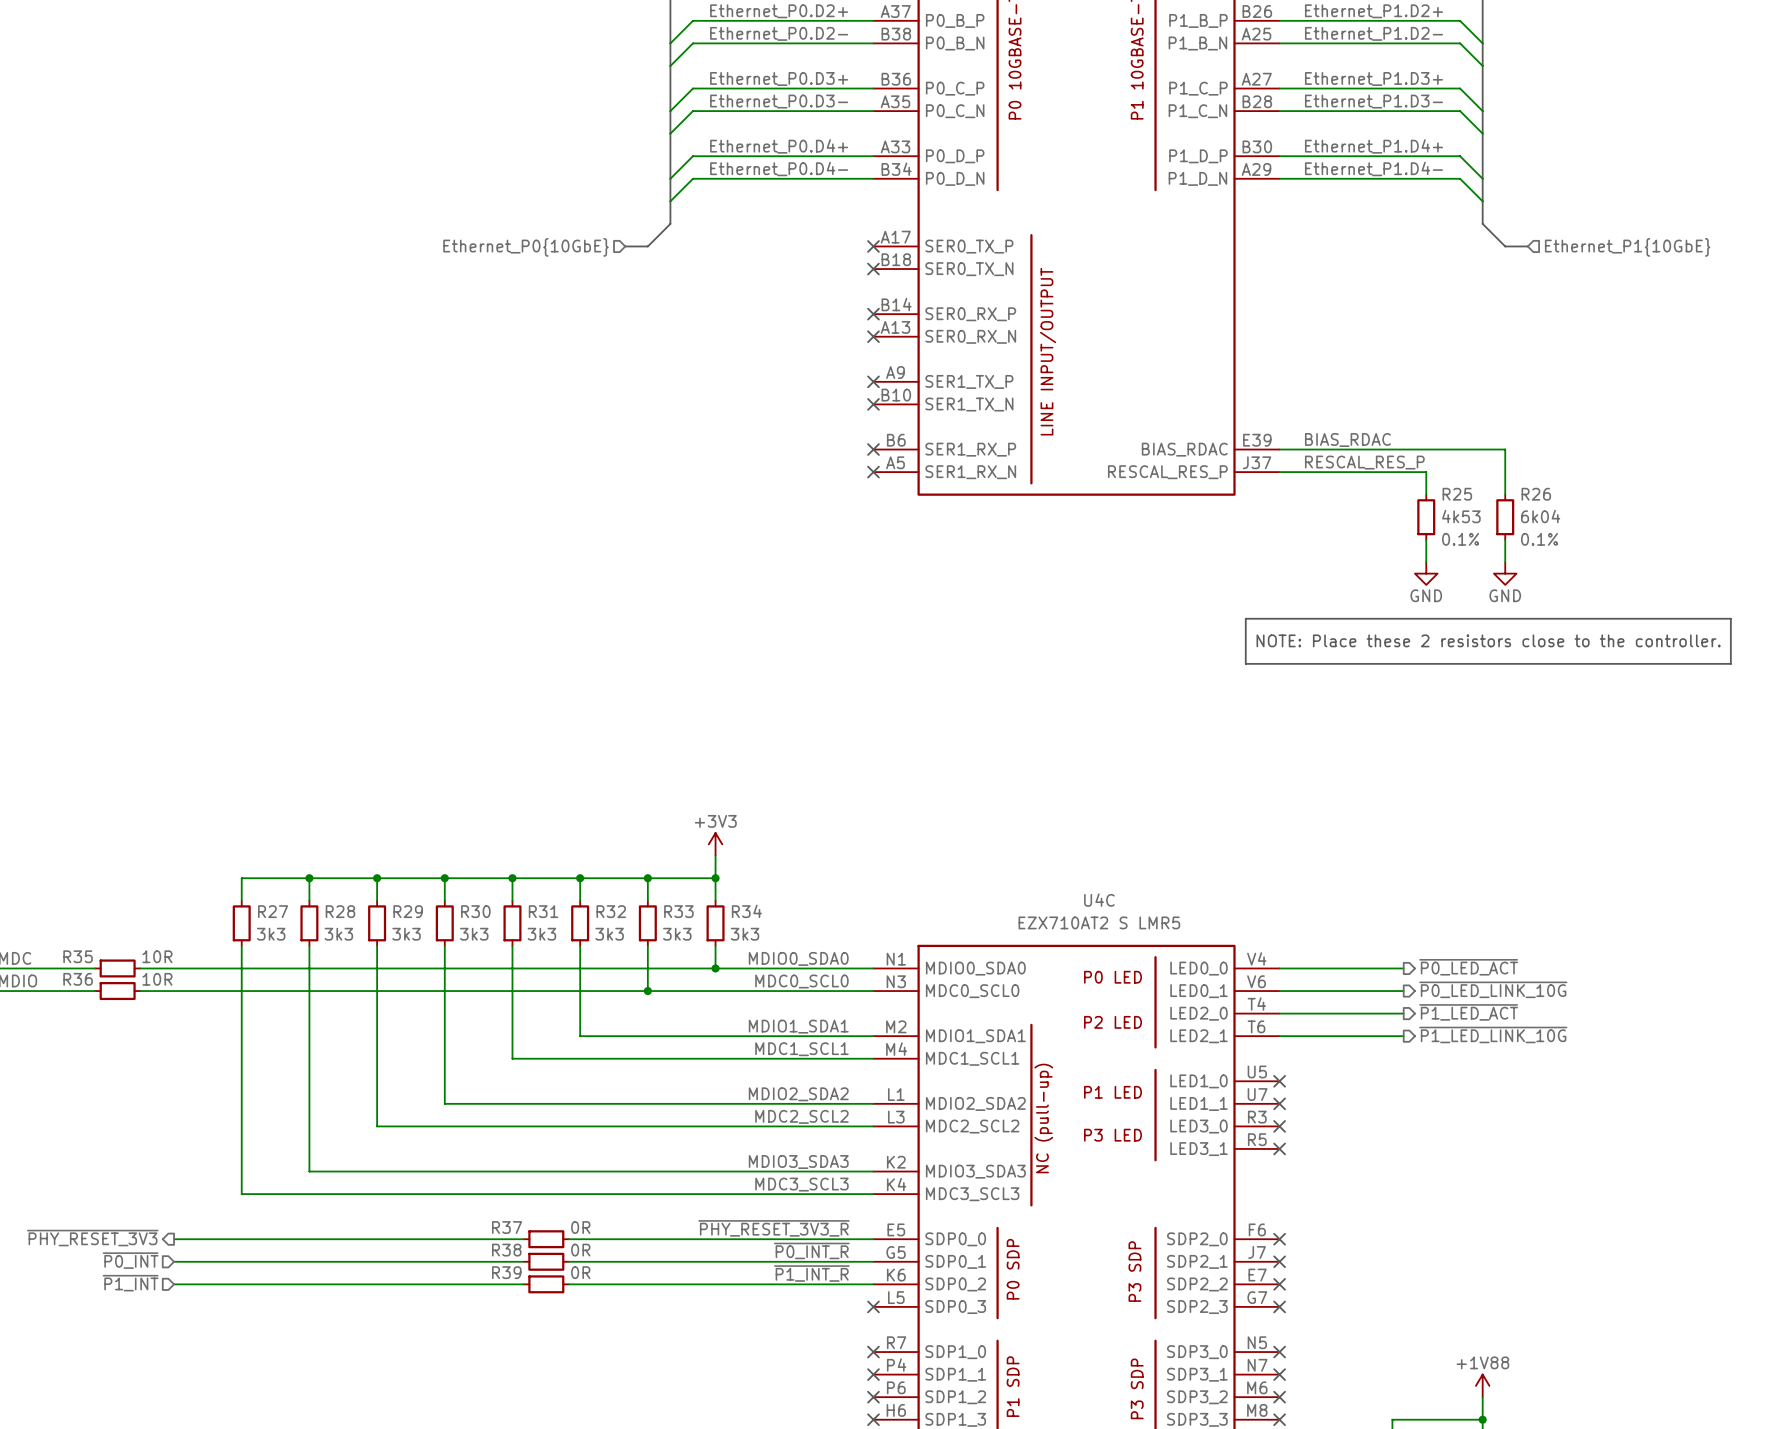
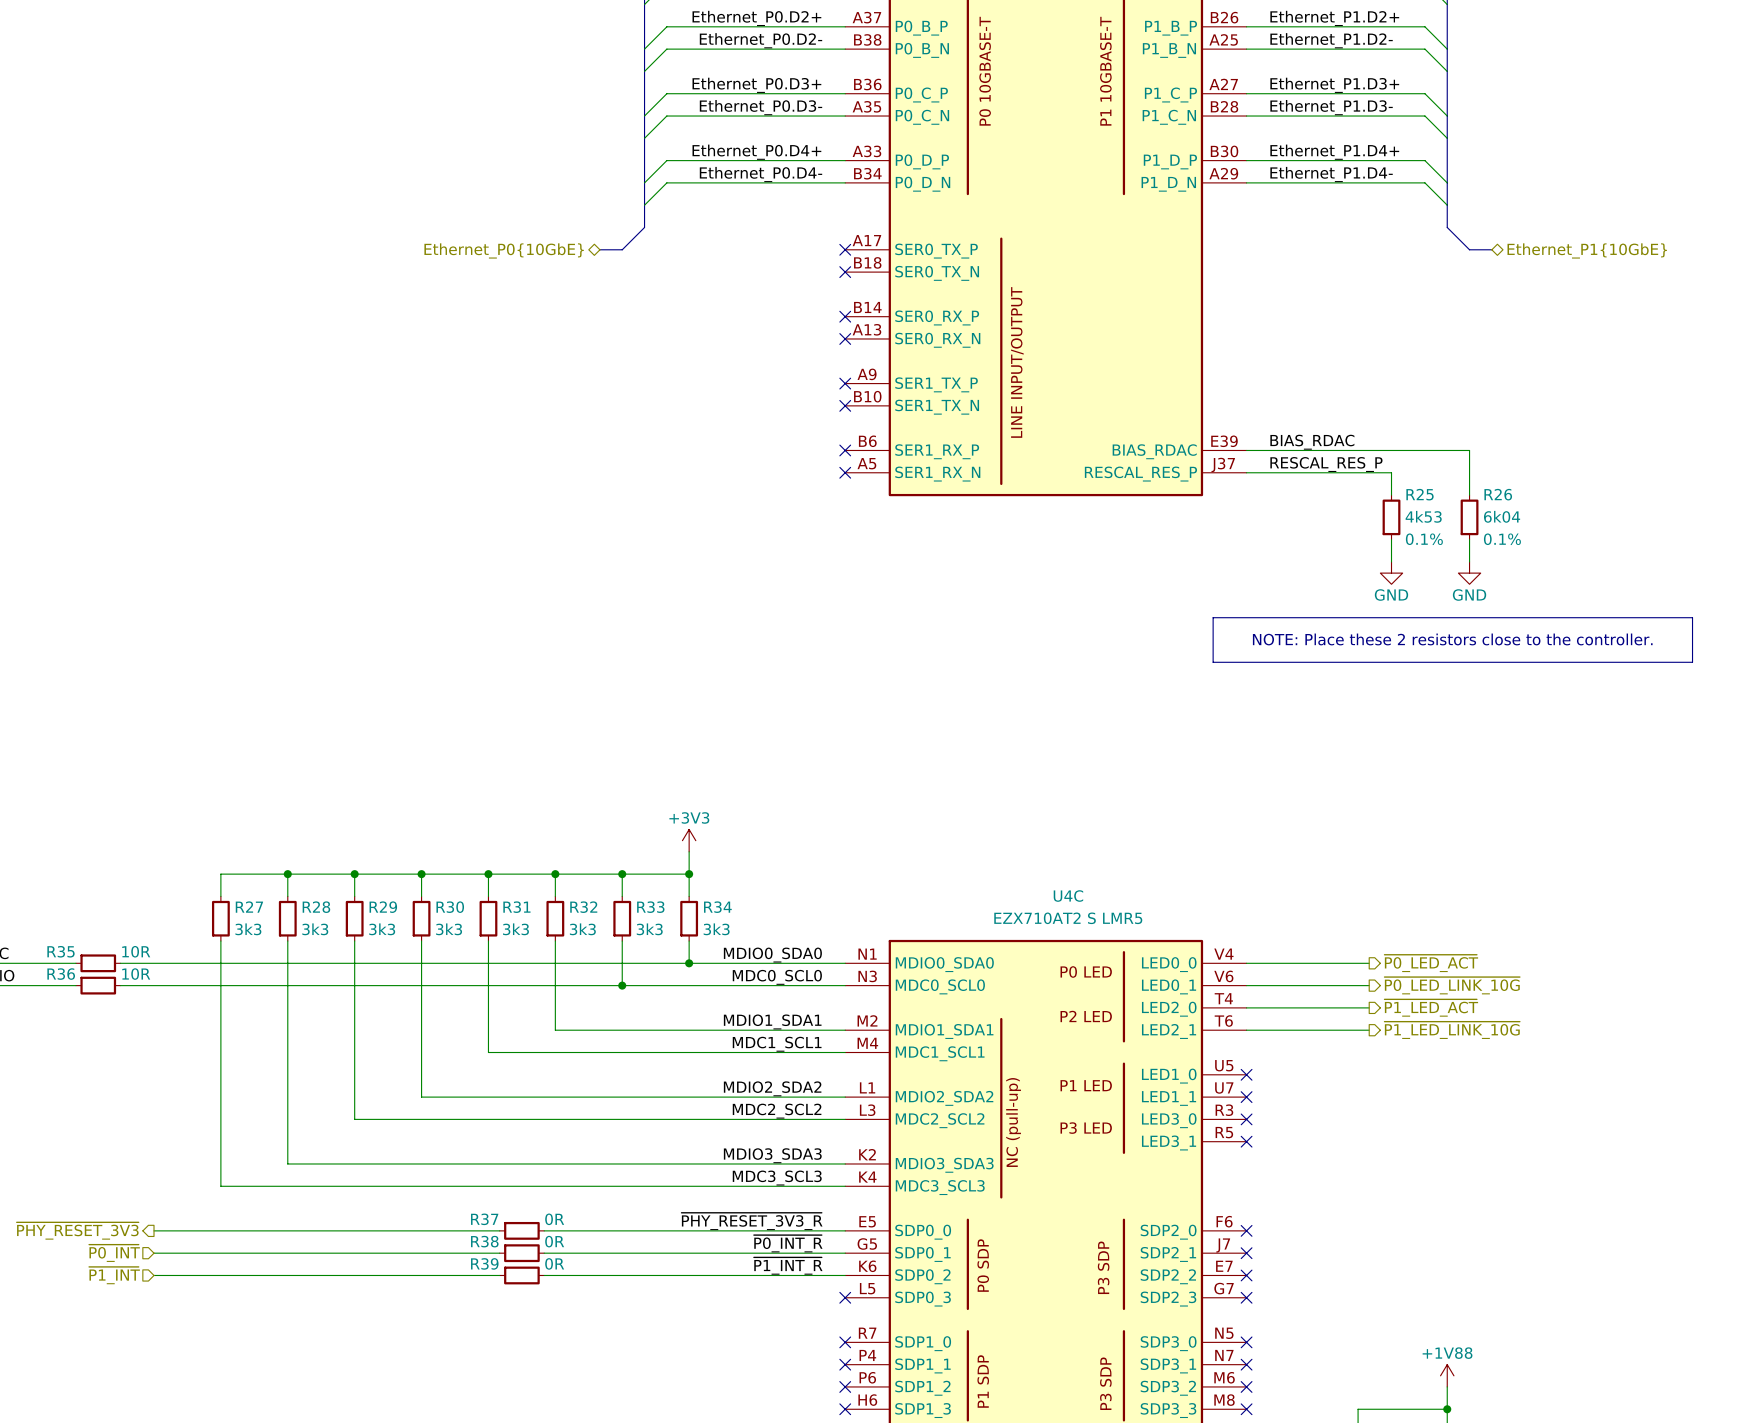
hierarchical label shape: input (526, 247) -> bidirectional (504, 250)
hierarchical label shape: input (1627, 247) -> bidirectional (1587, 250)

